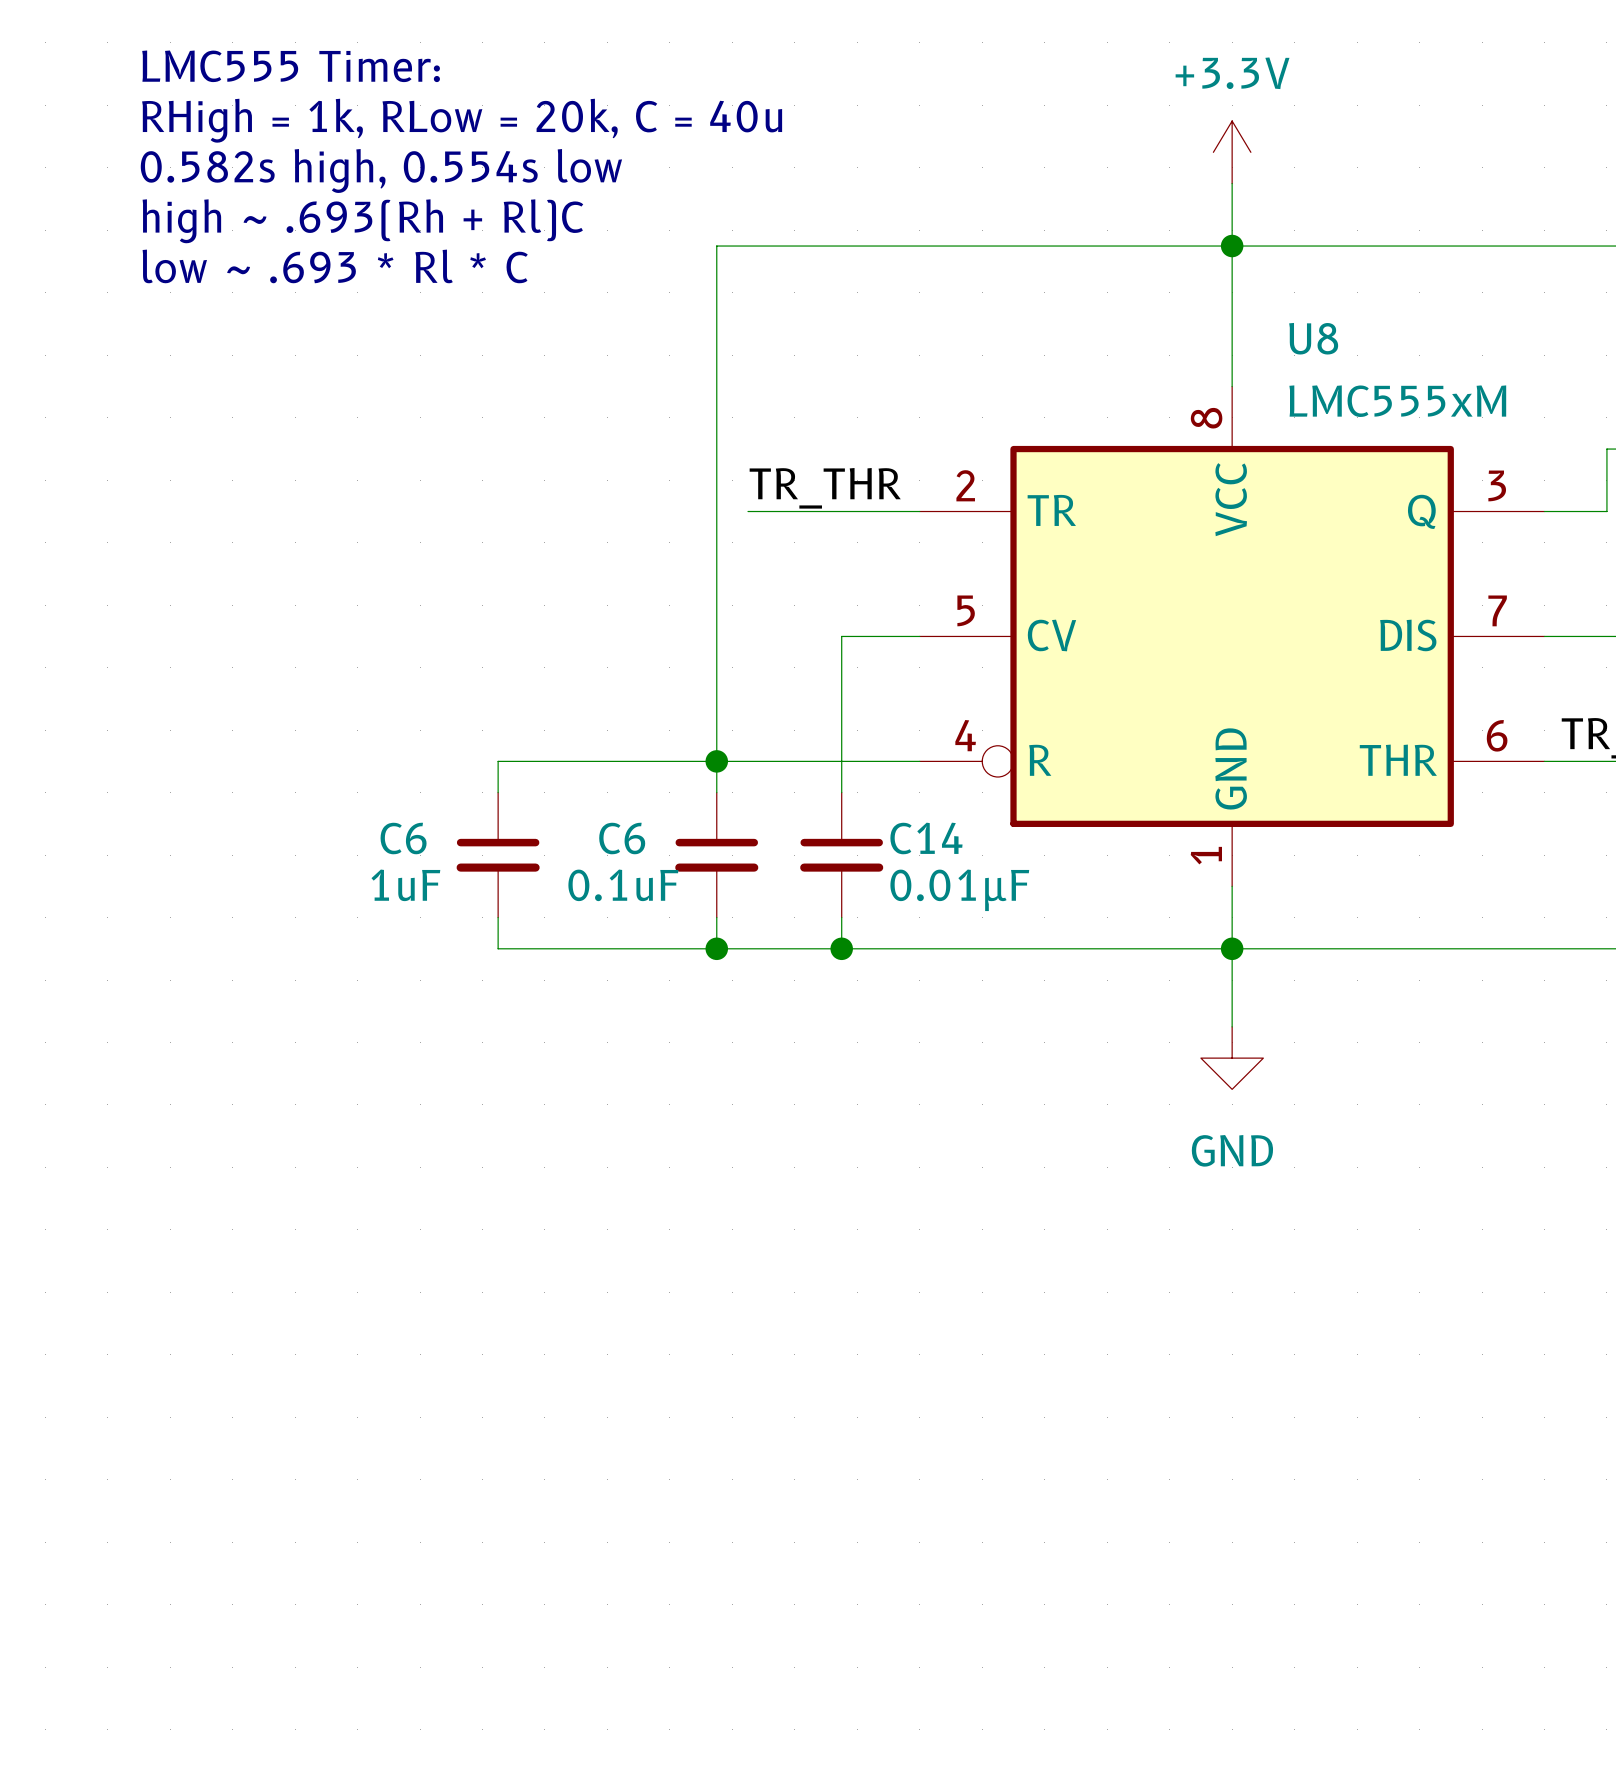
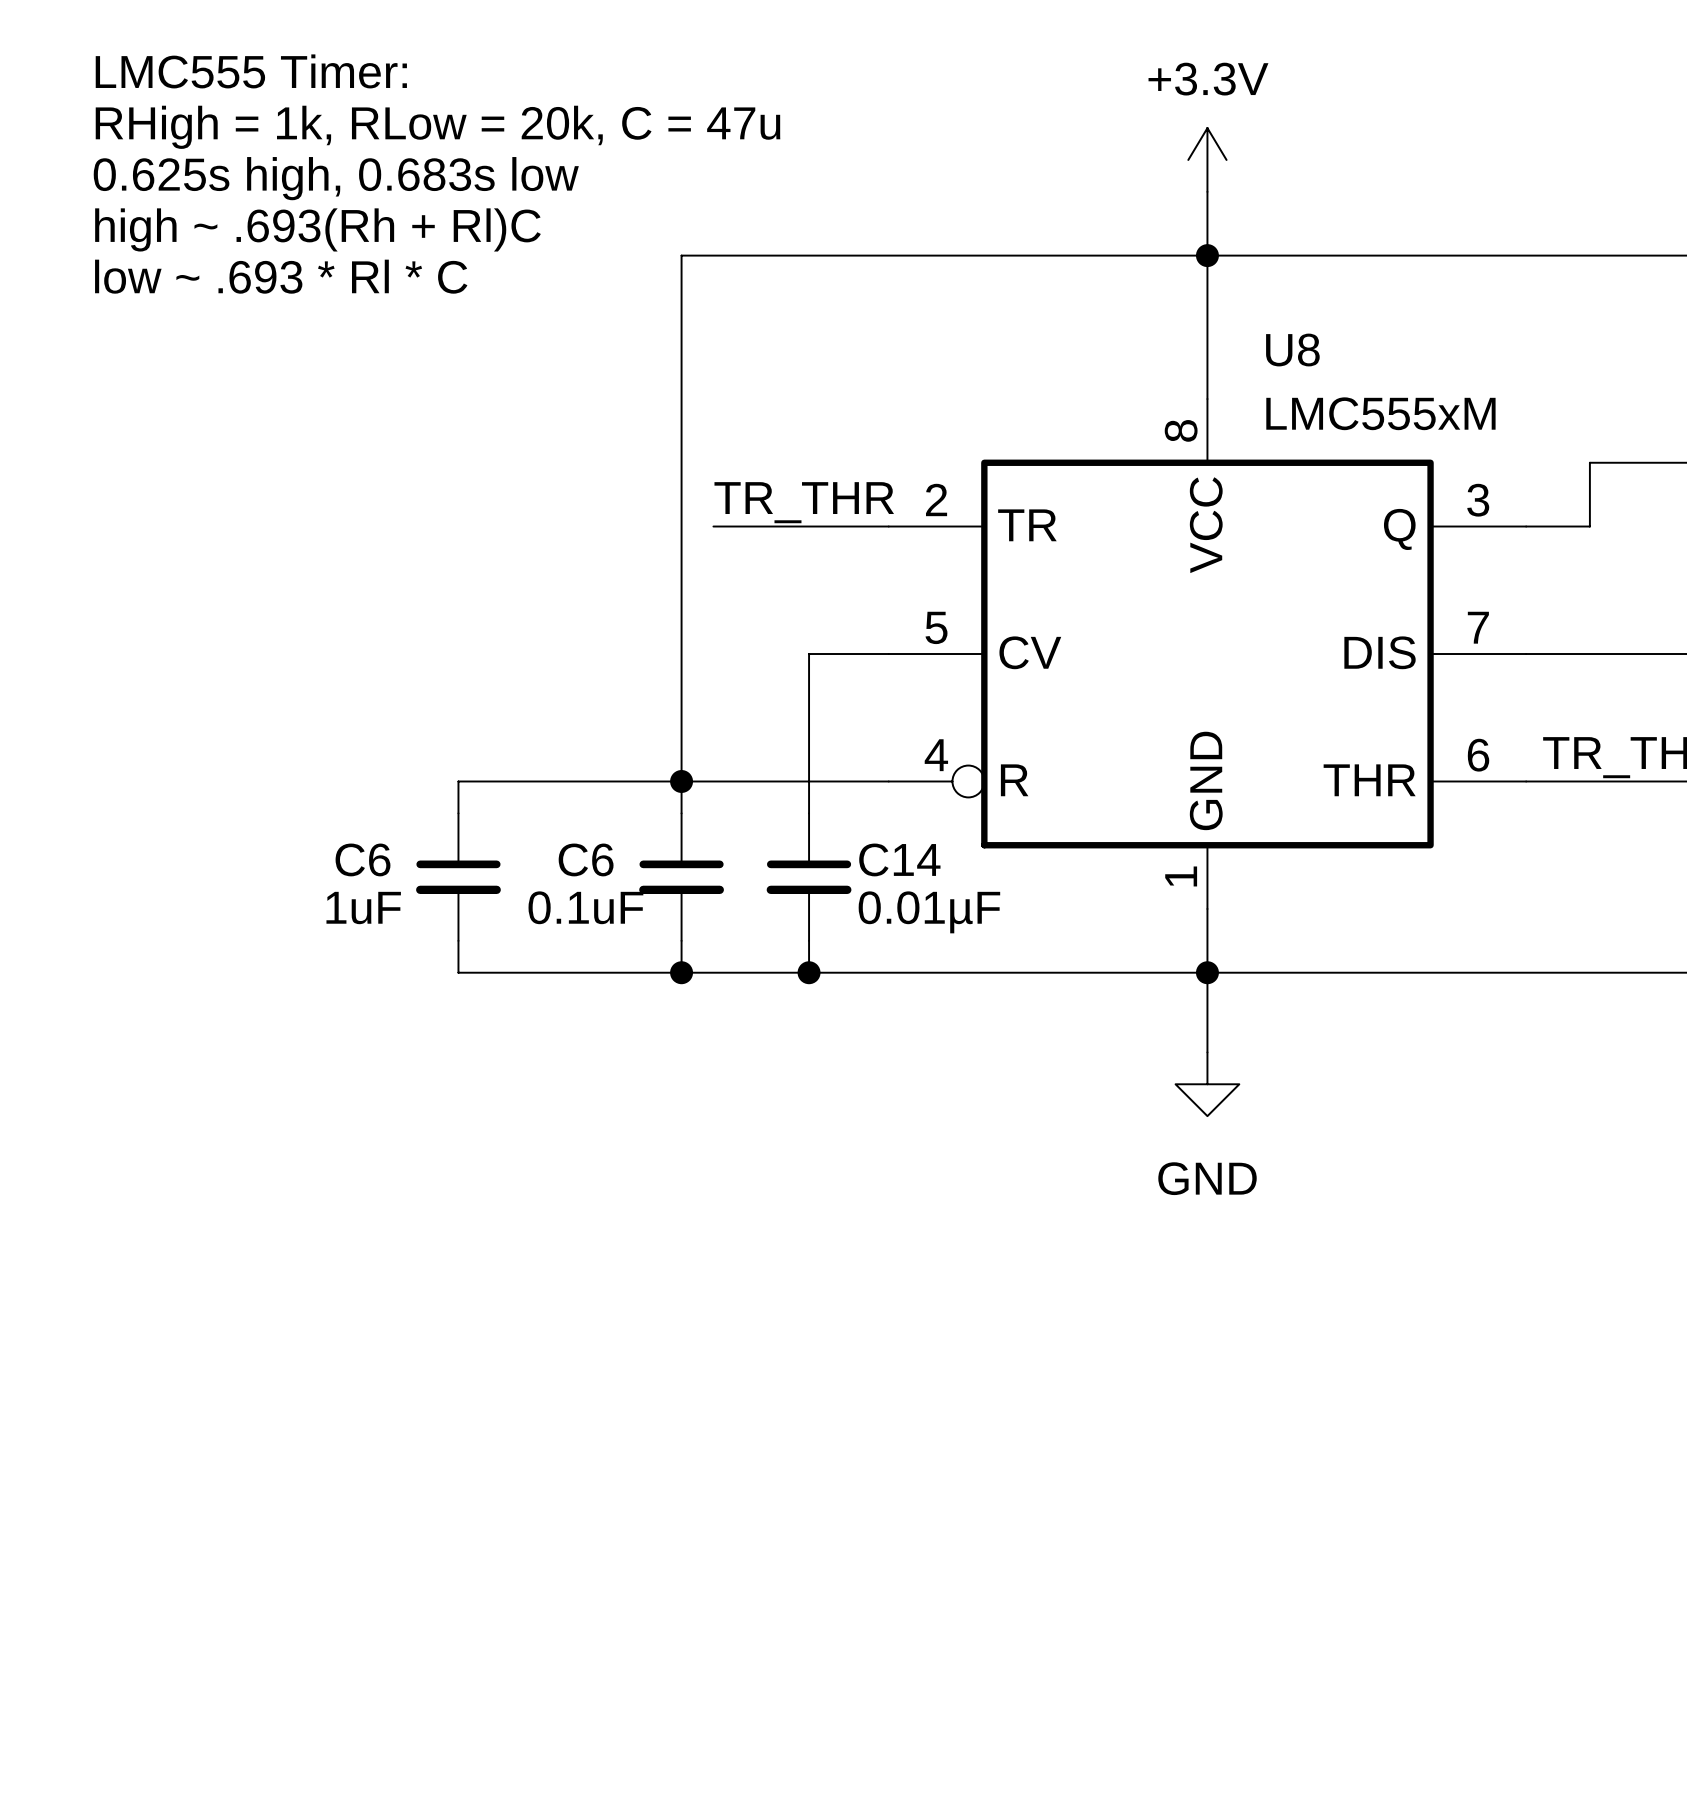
text: RHigh = 1k, RLow = 20k, C = 40u (462, 120) -> RHigh = 1k, RLow = 20k, C = 47u (438, 127)
text: 0.582s high, 0.554s low (381, 170) -> 0.625s high, 0.683s low (336, 178)

